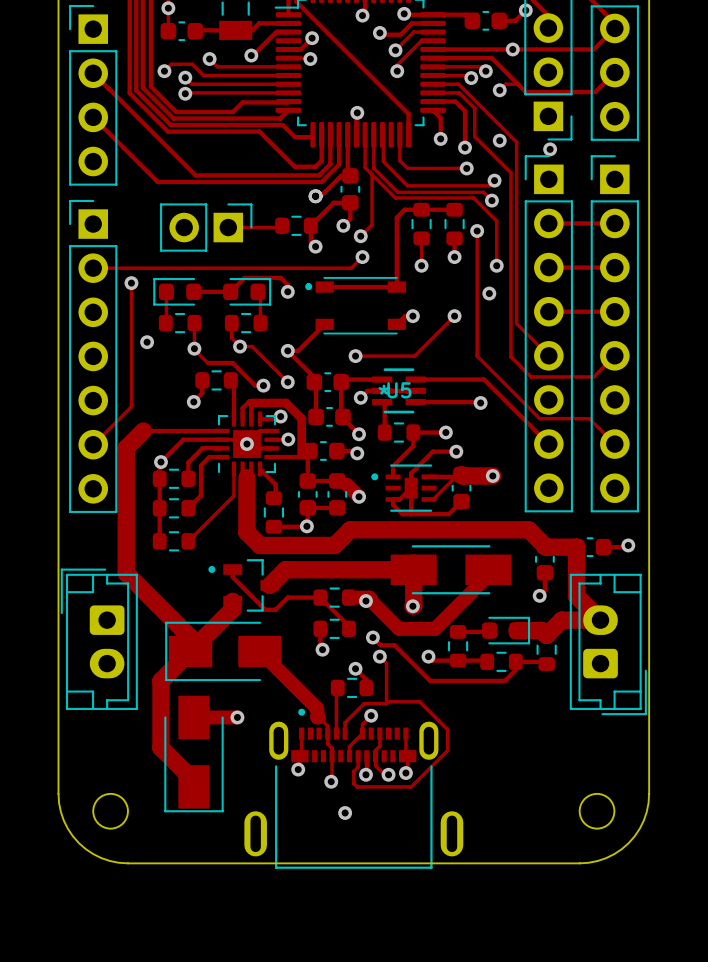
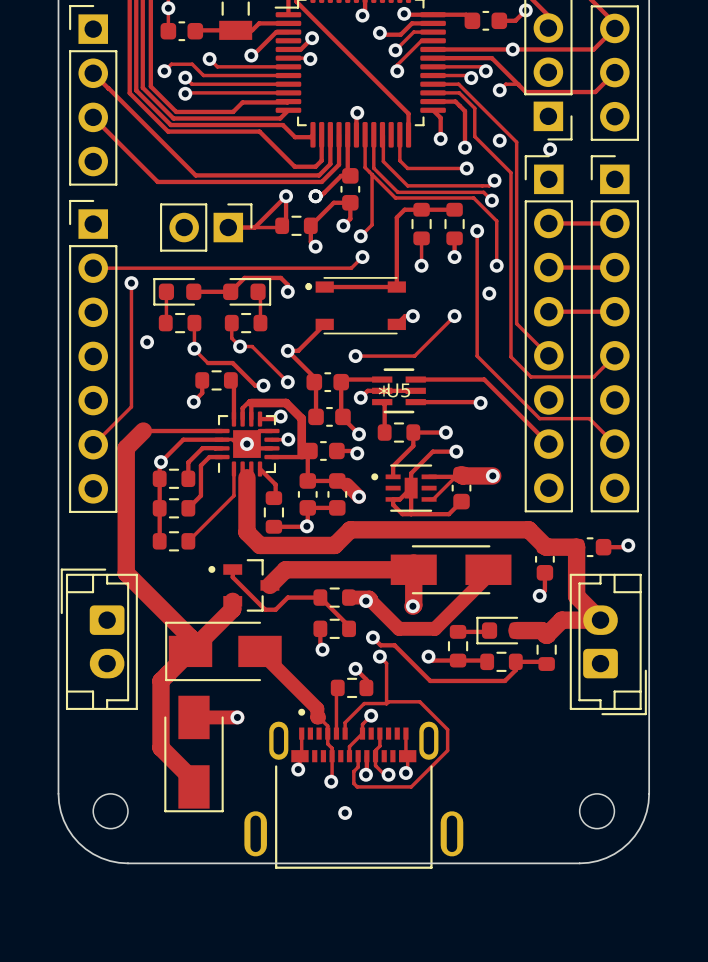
via: none -> (286, 196)
track: none -> (282, 225) (286, 221) (286, 196) (254, 227) (228, 227)
part rotation: 0° (506, 630) -> 180° (500, 630)

